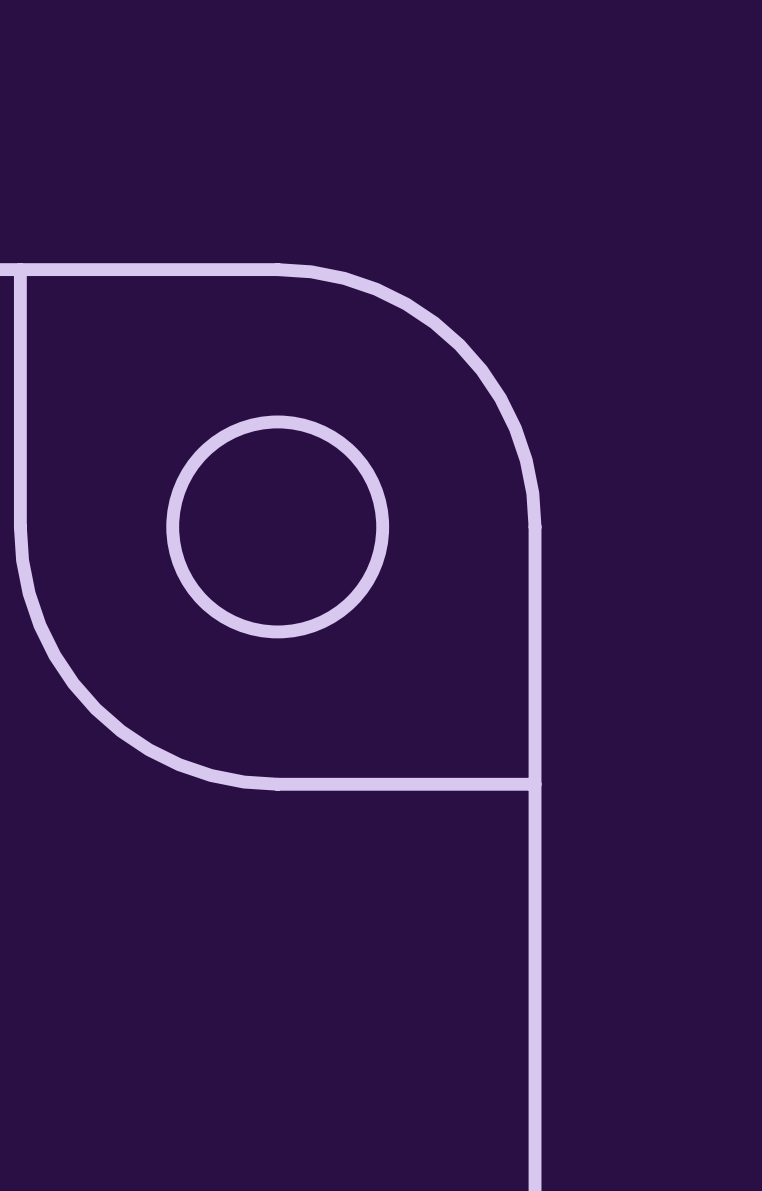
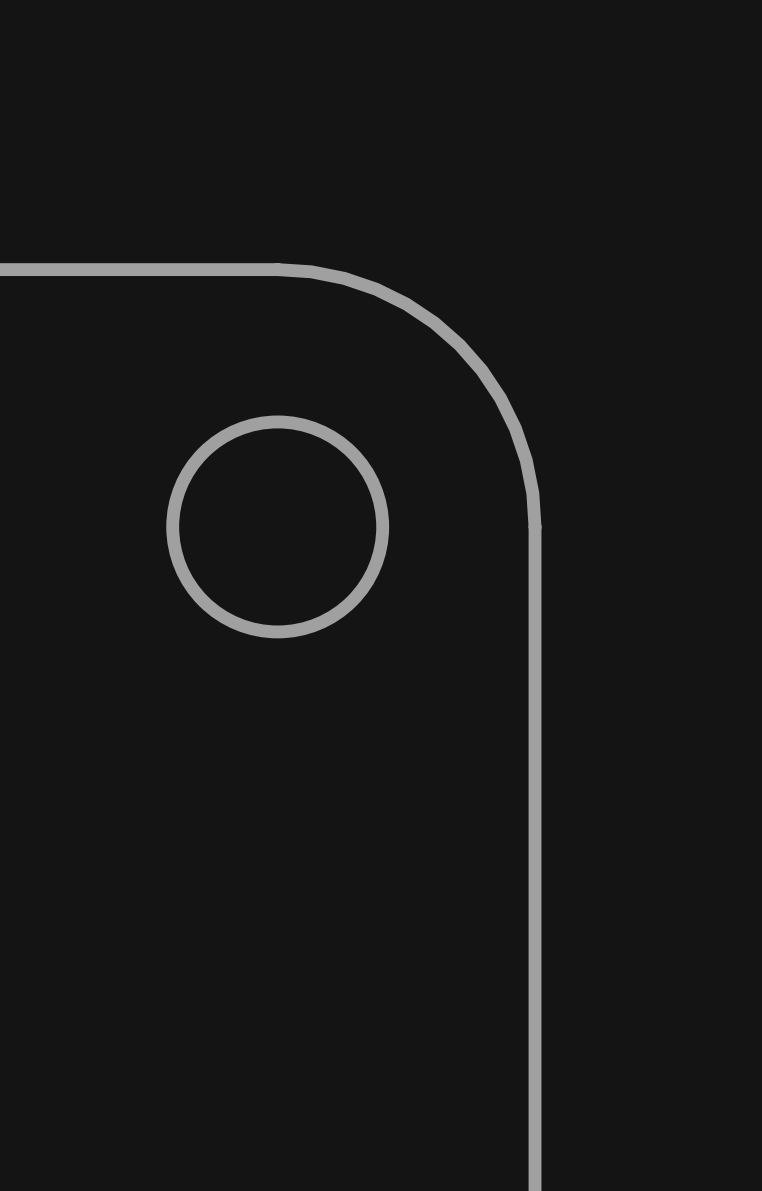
board edge: (20, 269) (20, 526) (22, 560) (29, 593) (39, 625) (54, 655) (73, 683) (95, 708) (121, 731) (149, 749) (179, 764) (211, 775) (244, 782) (277, 784) (535, 784) -> none

